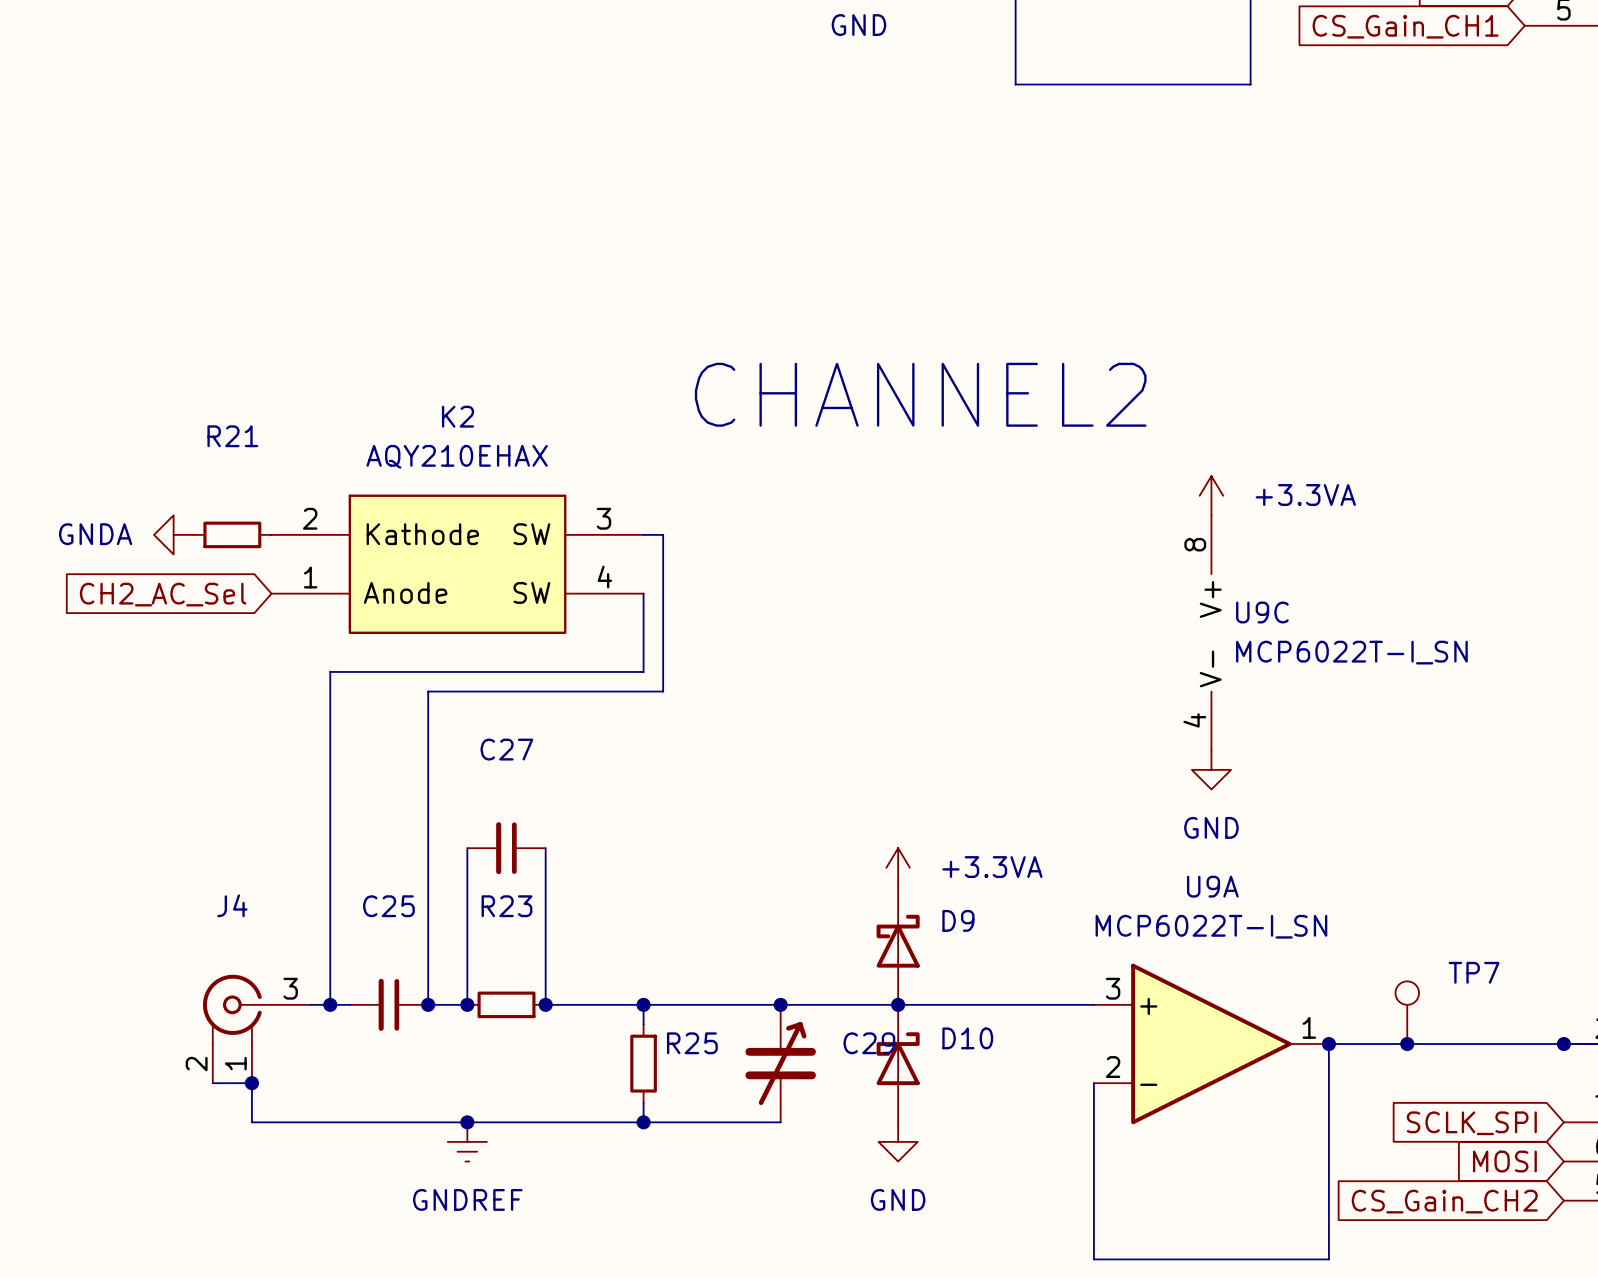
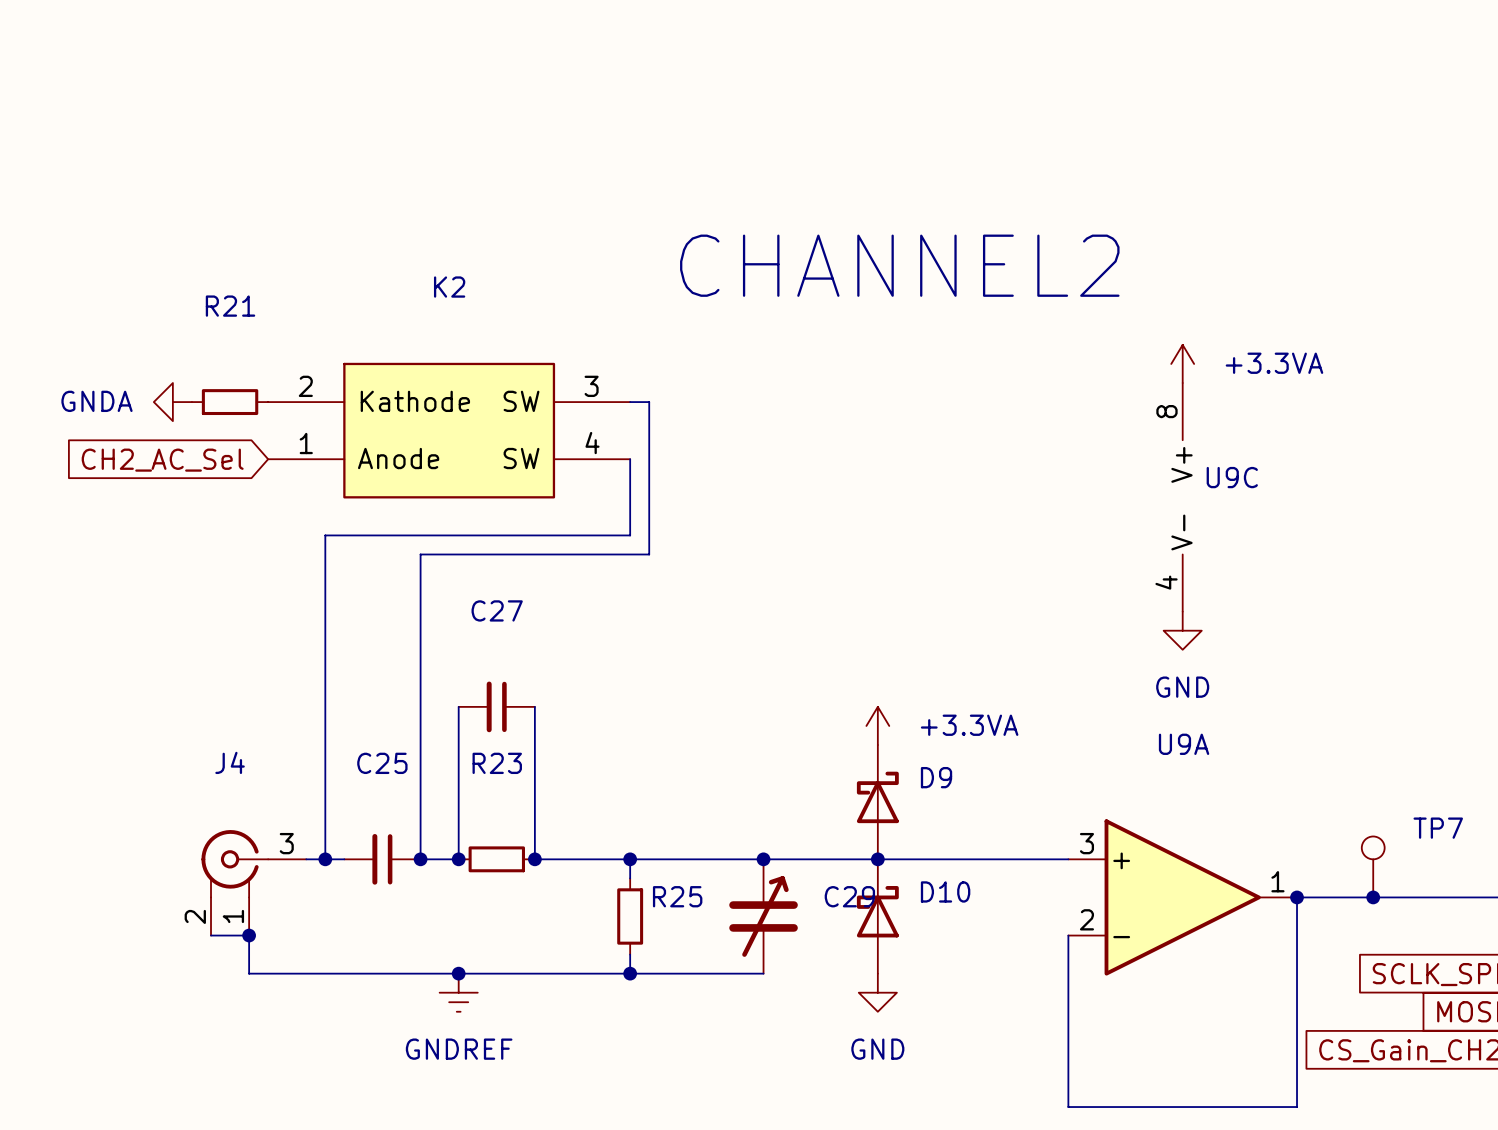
K2 value: AQY210EHAX (457, 456) -> none
U9C value: MCP6022T-I_SN (1351, 652) -> none
U9A value: MCP6022T-I_SN (1211, 926) -> none

